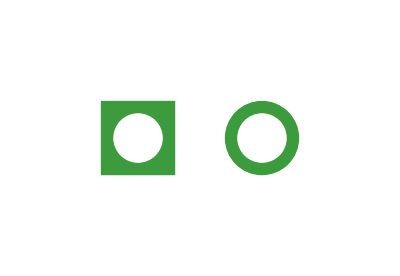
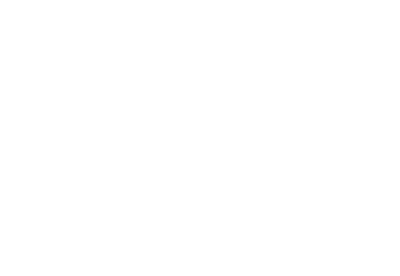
part: (200, 138) -> none

